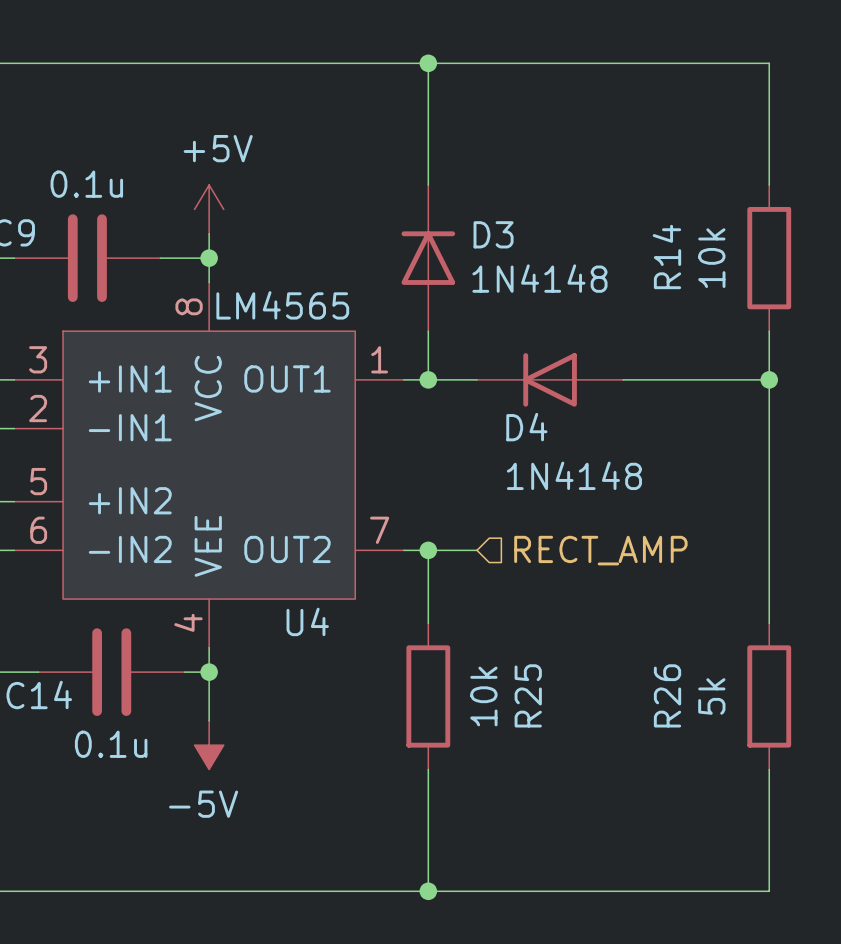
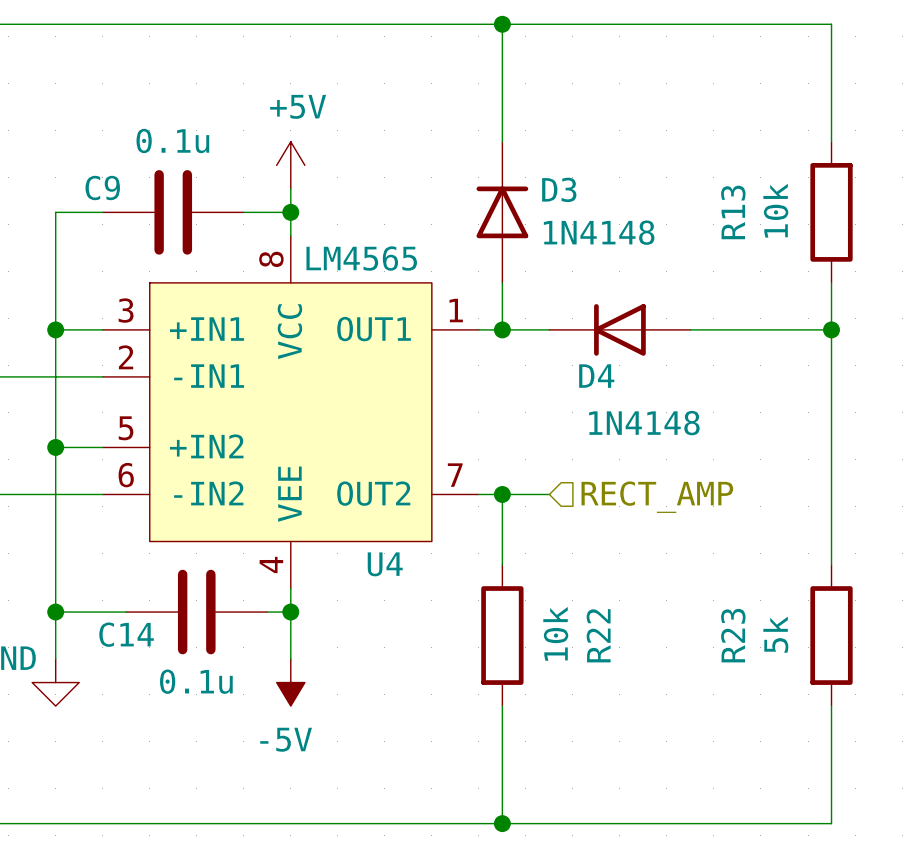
R14 name: R14 (666, 256) -> R13 (733, 212)
R25 name: R25 (528, 695) -> R22 (598, 635)
R26 name: R26 (667, 695) -> R23 (733, 635)

